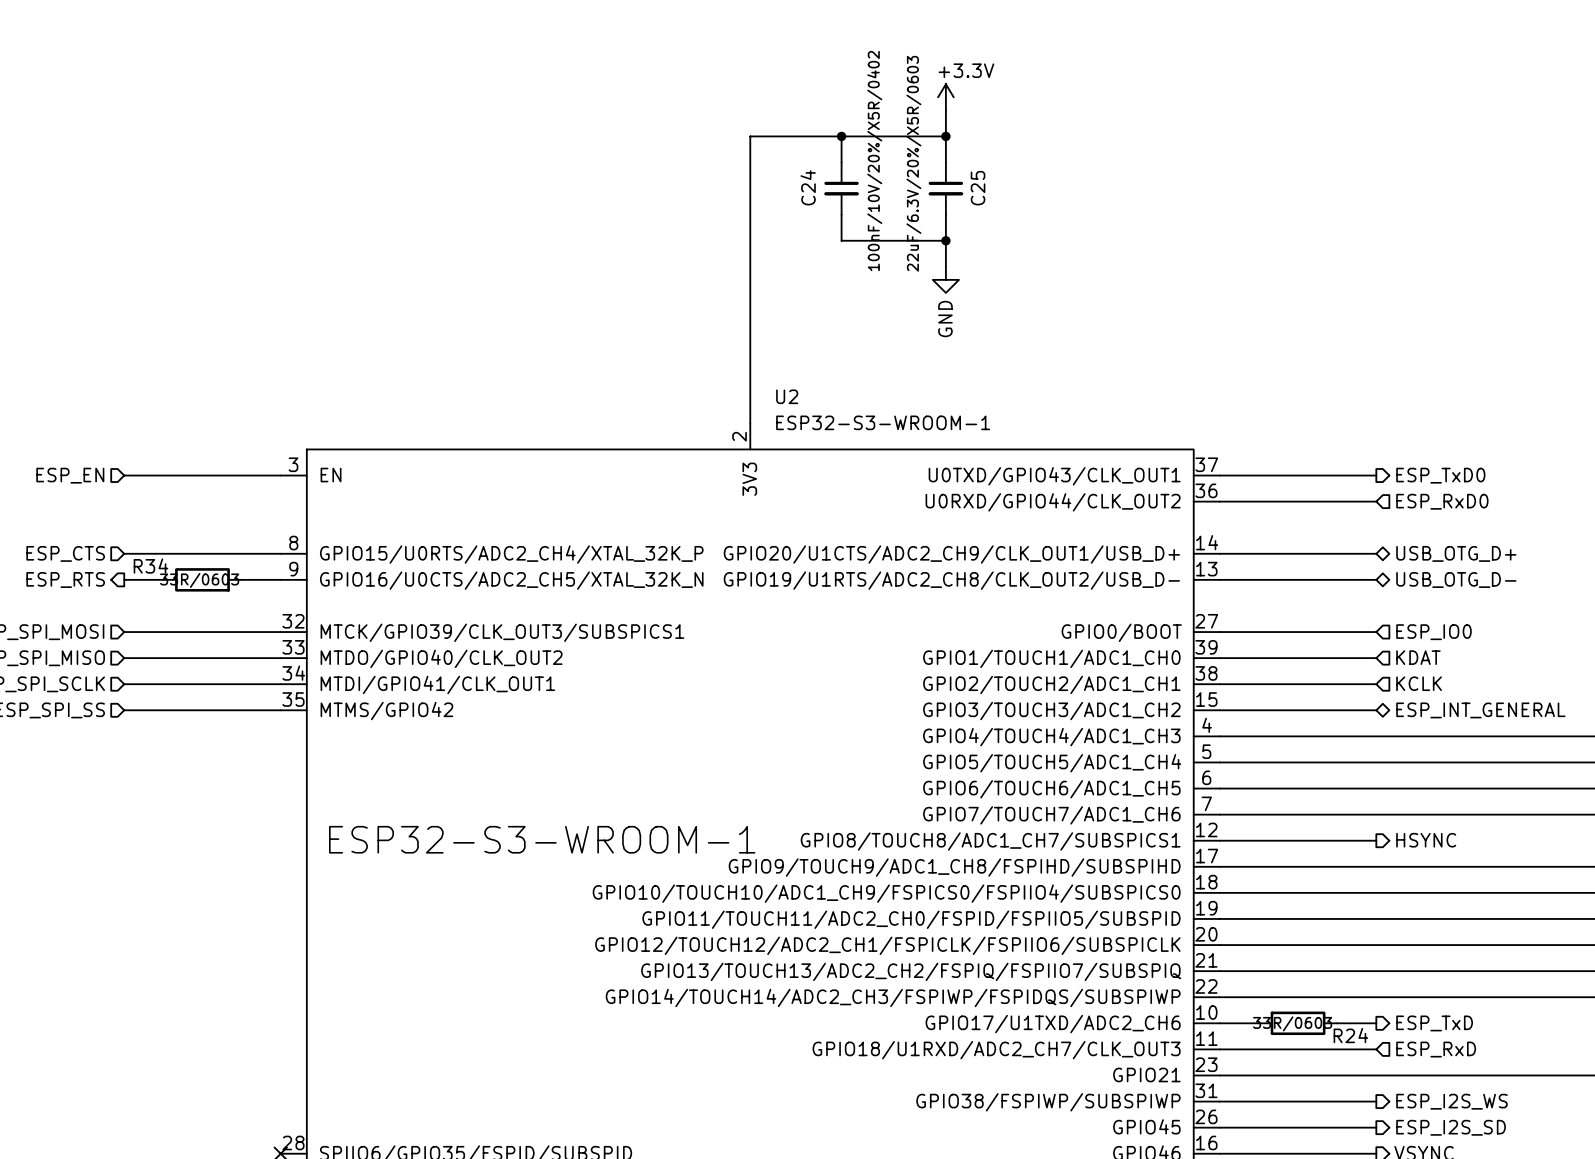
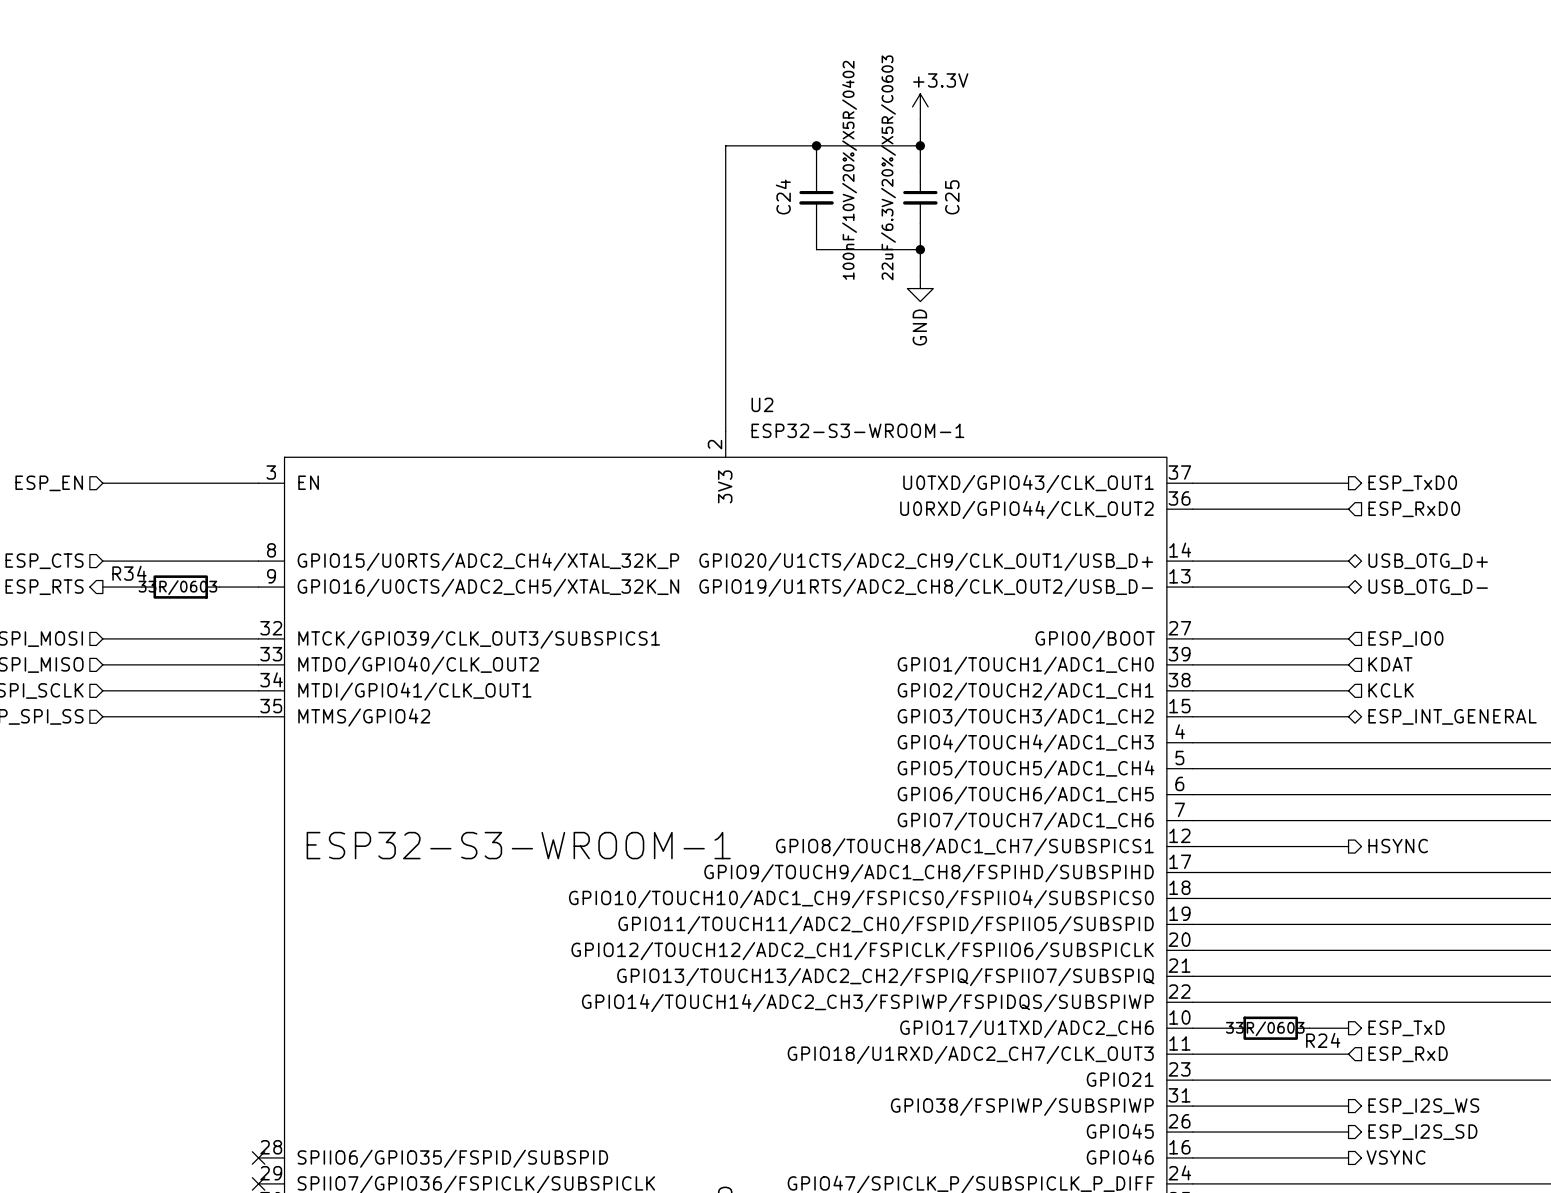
C25 value: 22uF/6.3V/20%/X5R/0603 (913, 163) -> 22uF/6.3V/20%/X5R/C0603 (888, 167)

